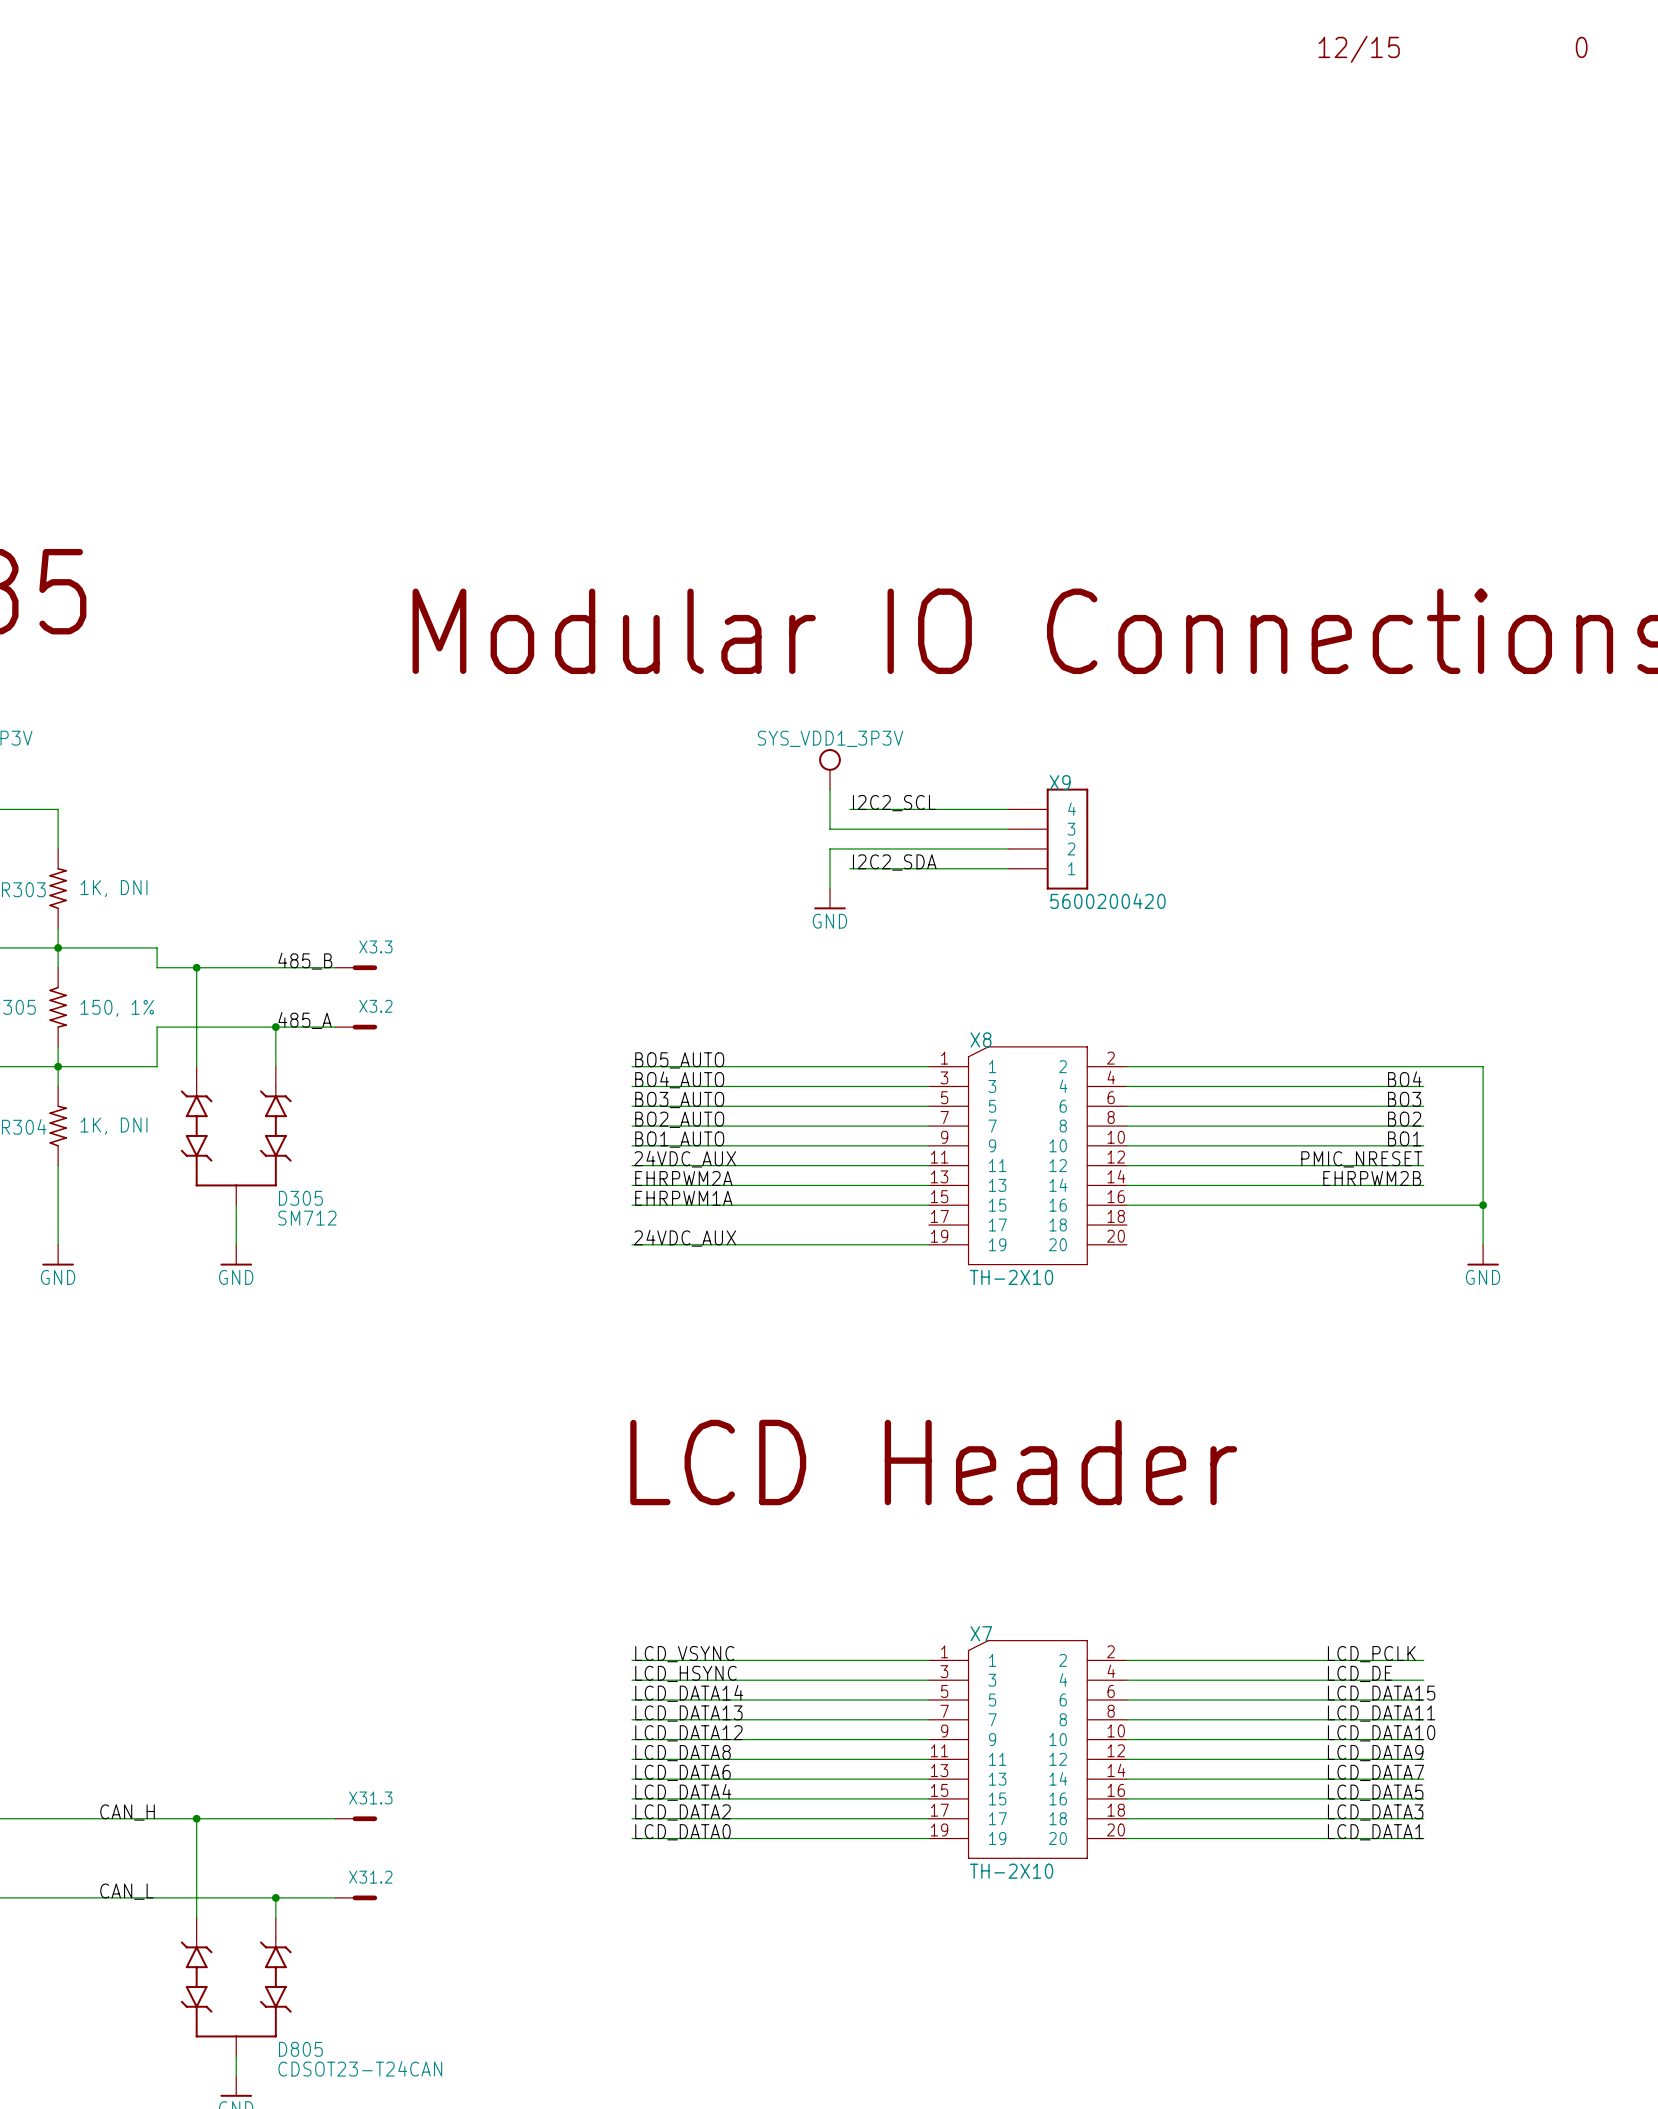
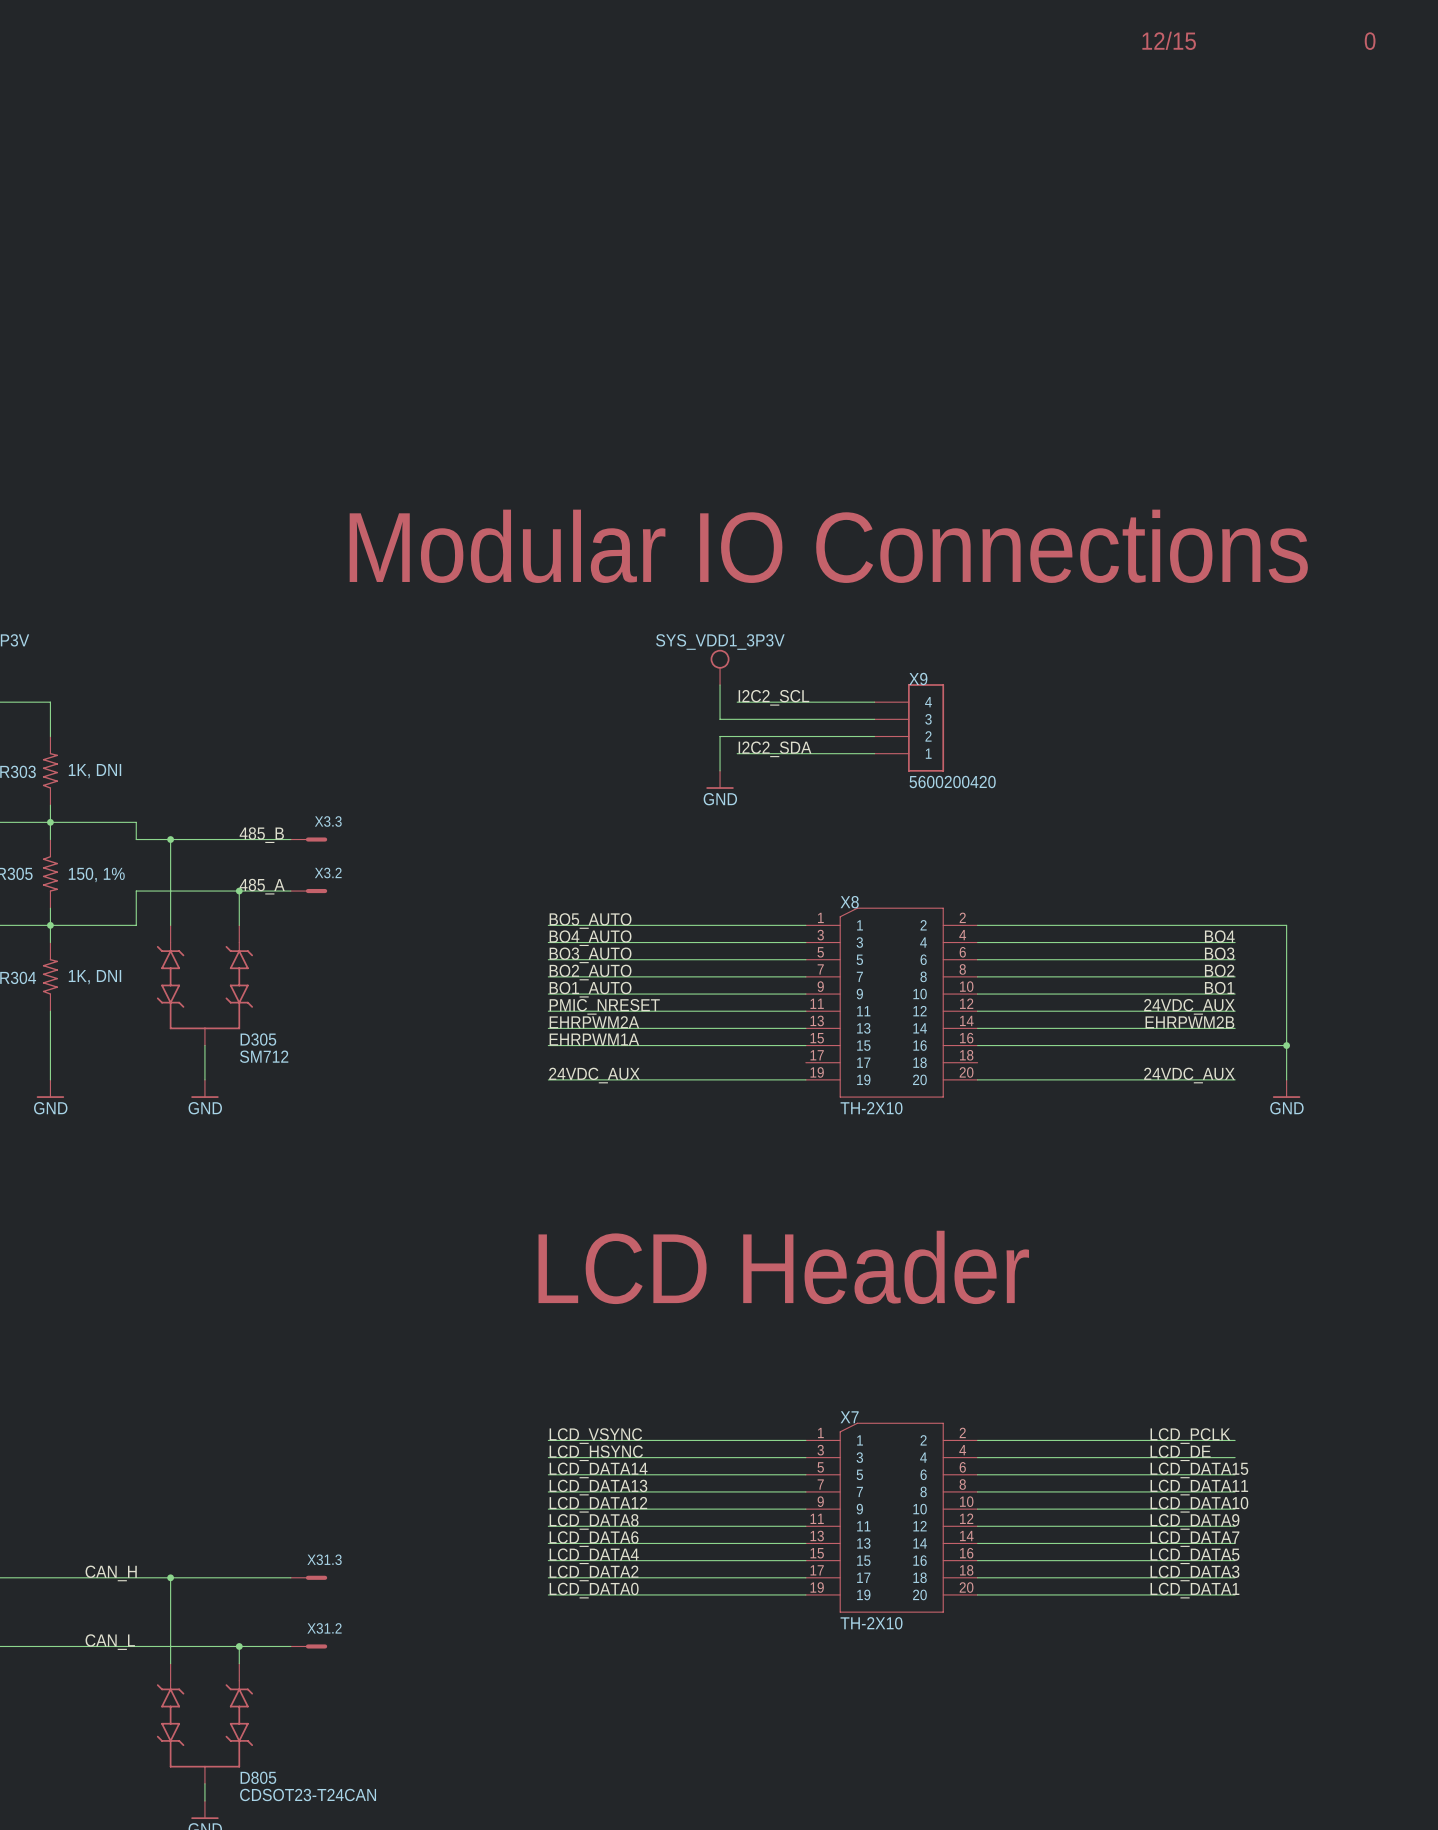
label: 24VDC_AUX (685, 1159) -> PMIC_NRESET (604, 1006)
label: PMIC_NRESET (1361, 1159) -> 24VDC_AUX (1189, 1006)
label: none -> 24VDC_AUX (1189, 1075)
wire: none -> (977, 1079) (1235, 1079)

